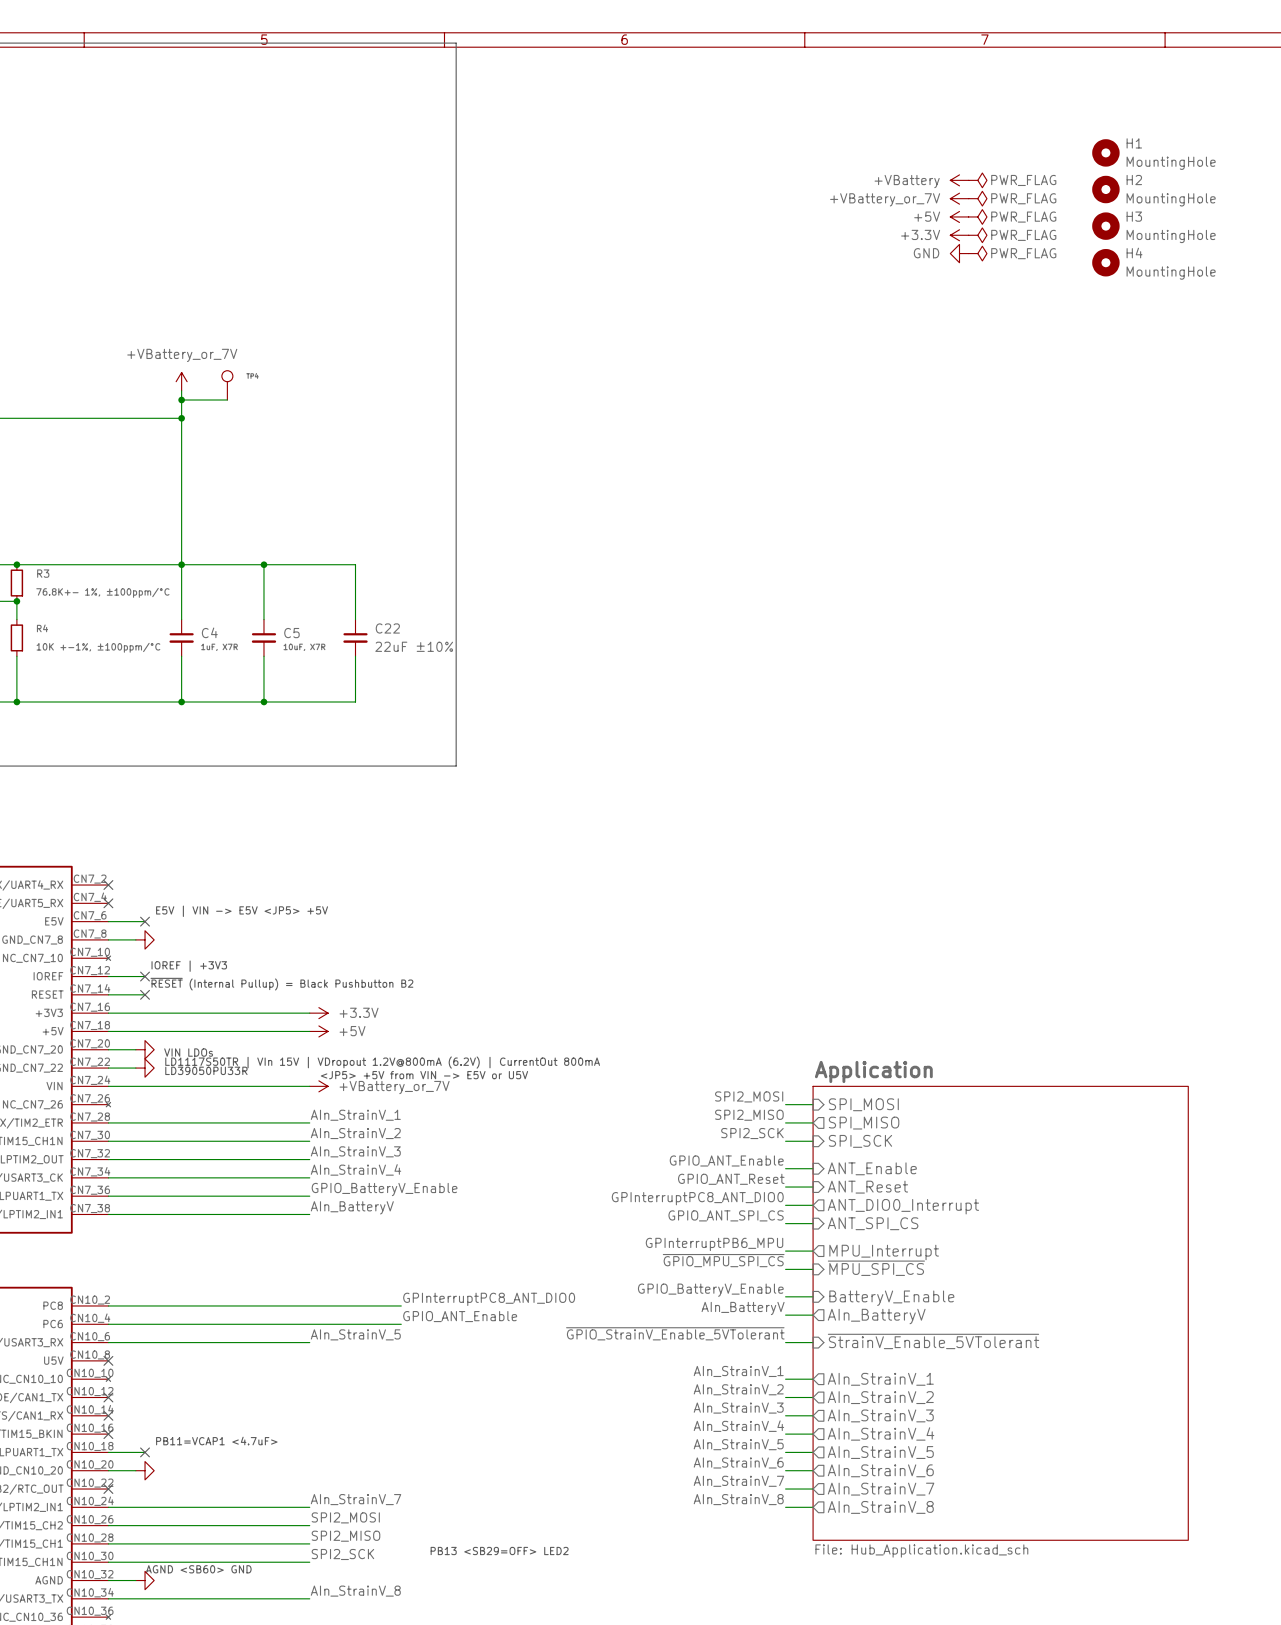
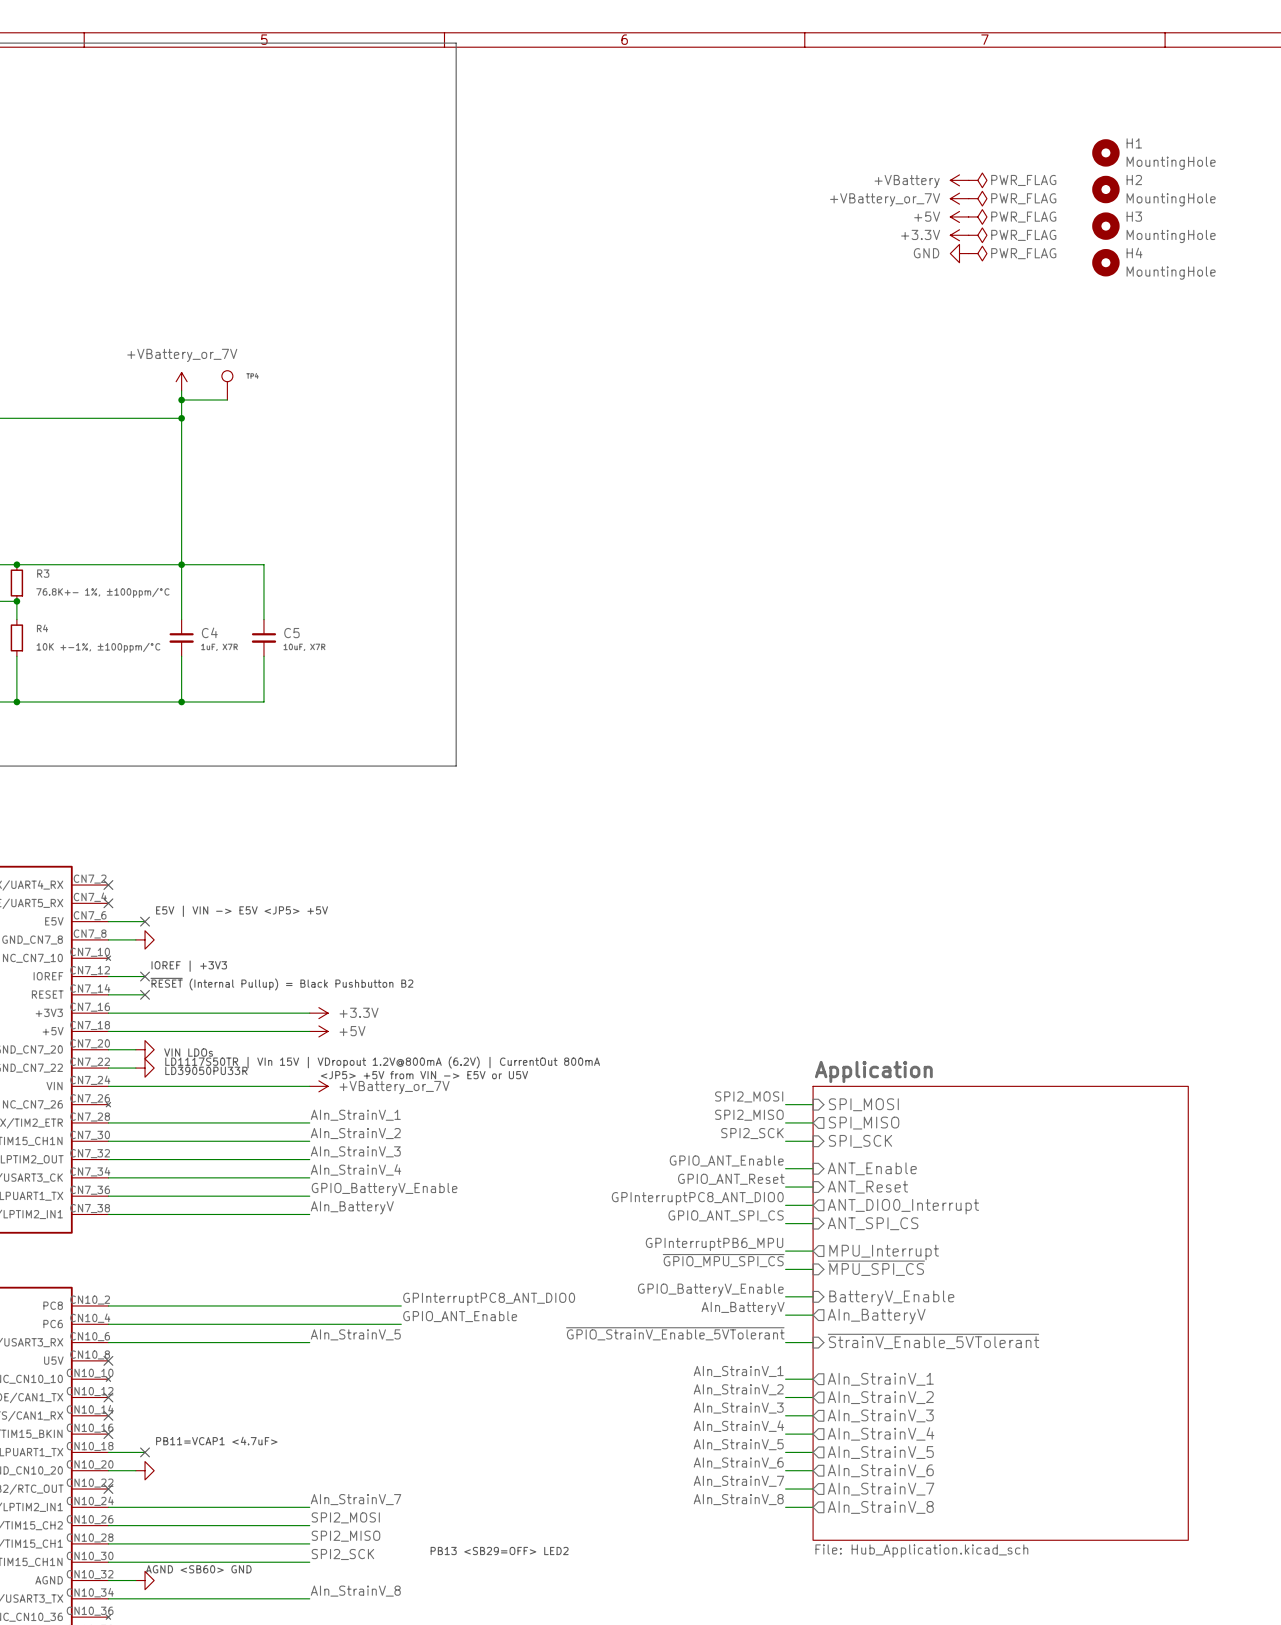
wire: (263, 564) (355, 564) (355, 619) -> none
junction: (263, 564) -> none
C22: 22uF ±10% (355, 637) -> none
wire: (355, 656) (355, 701) (263, 701) -> none
junction: (263, 701) -> none

